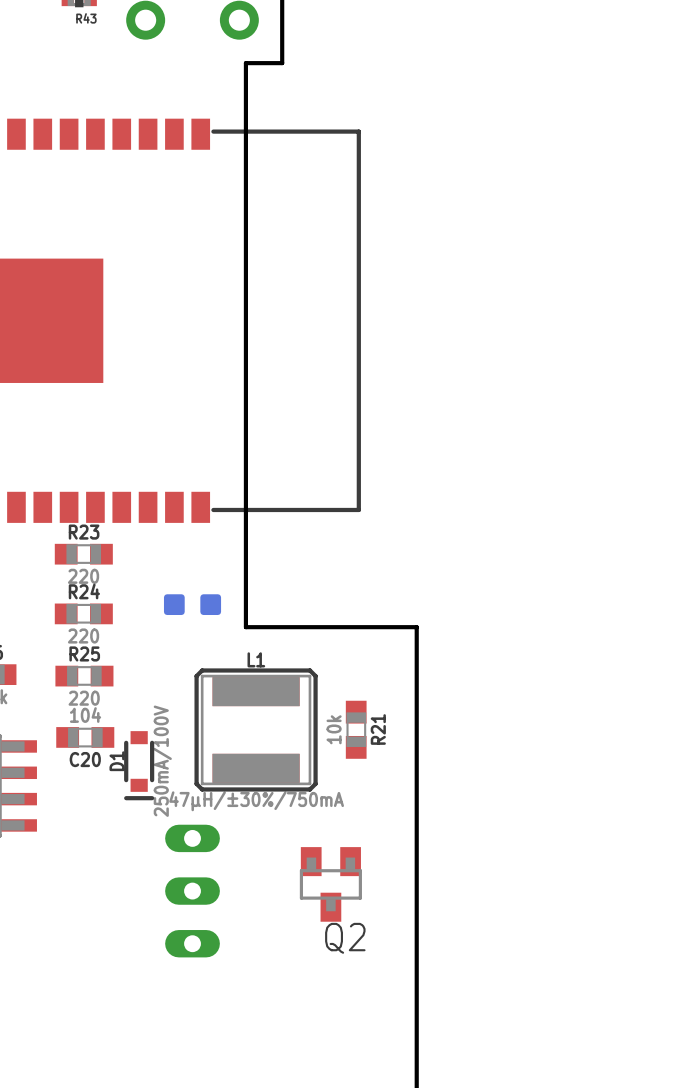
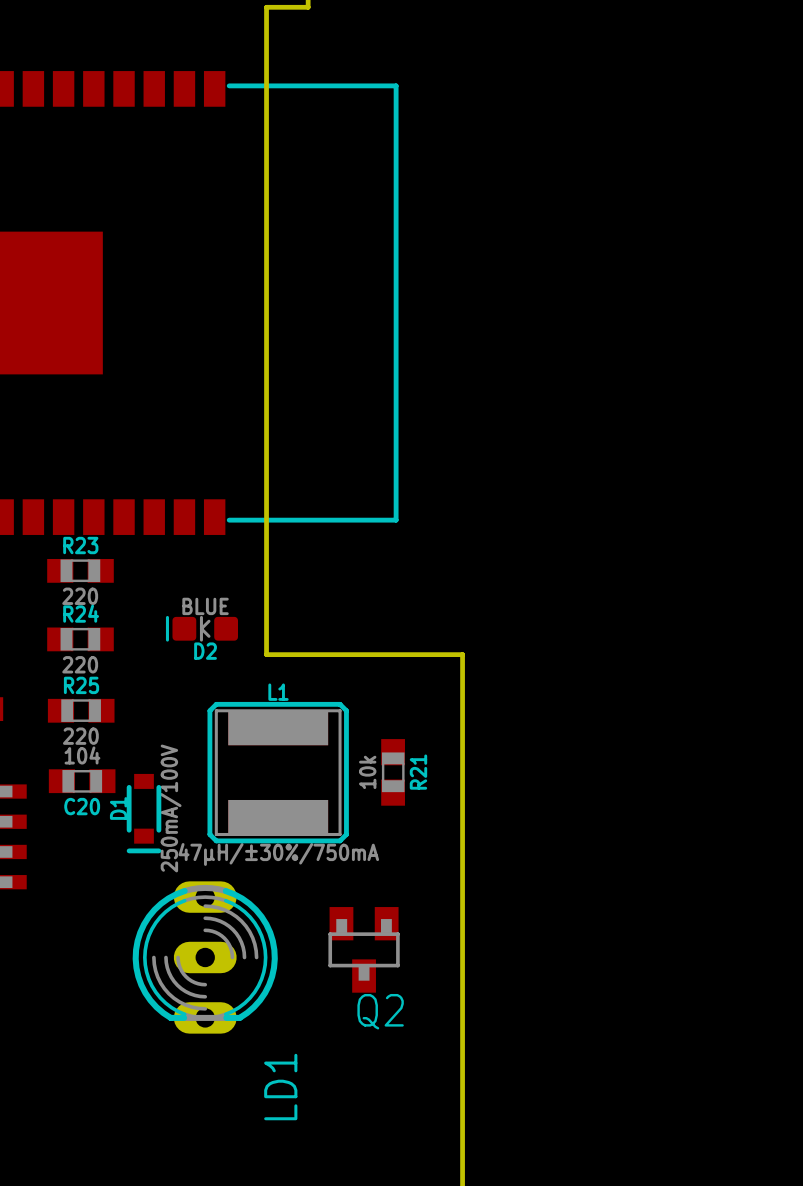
D2 side: bottom (192, 604) -> top (201, 628)
LD1 side: bottom (192, 891) -> top (205, 957)

